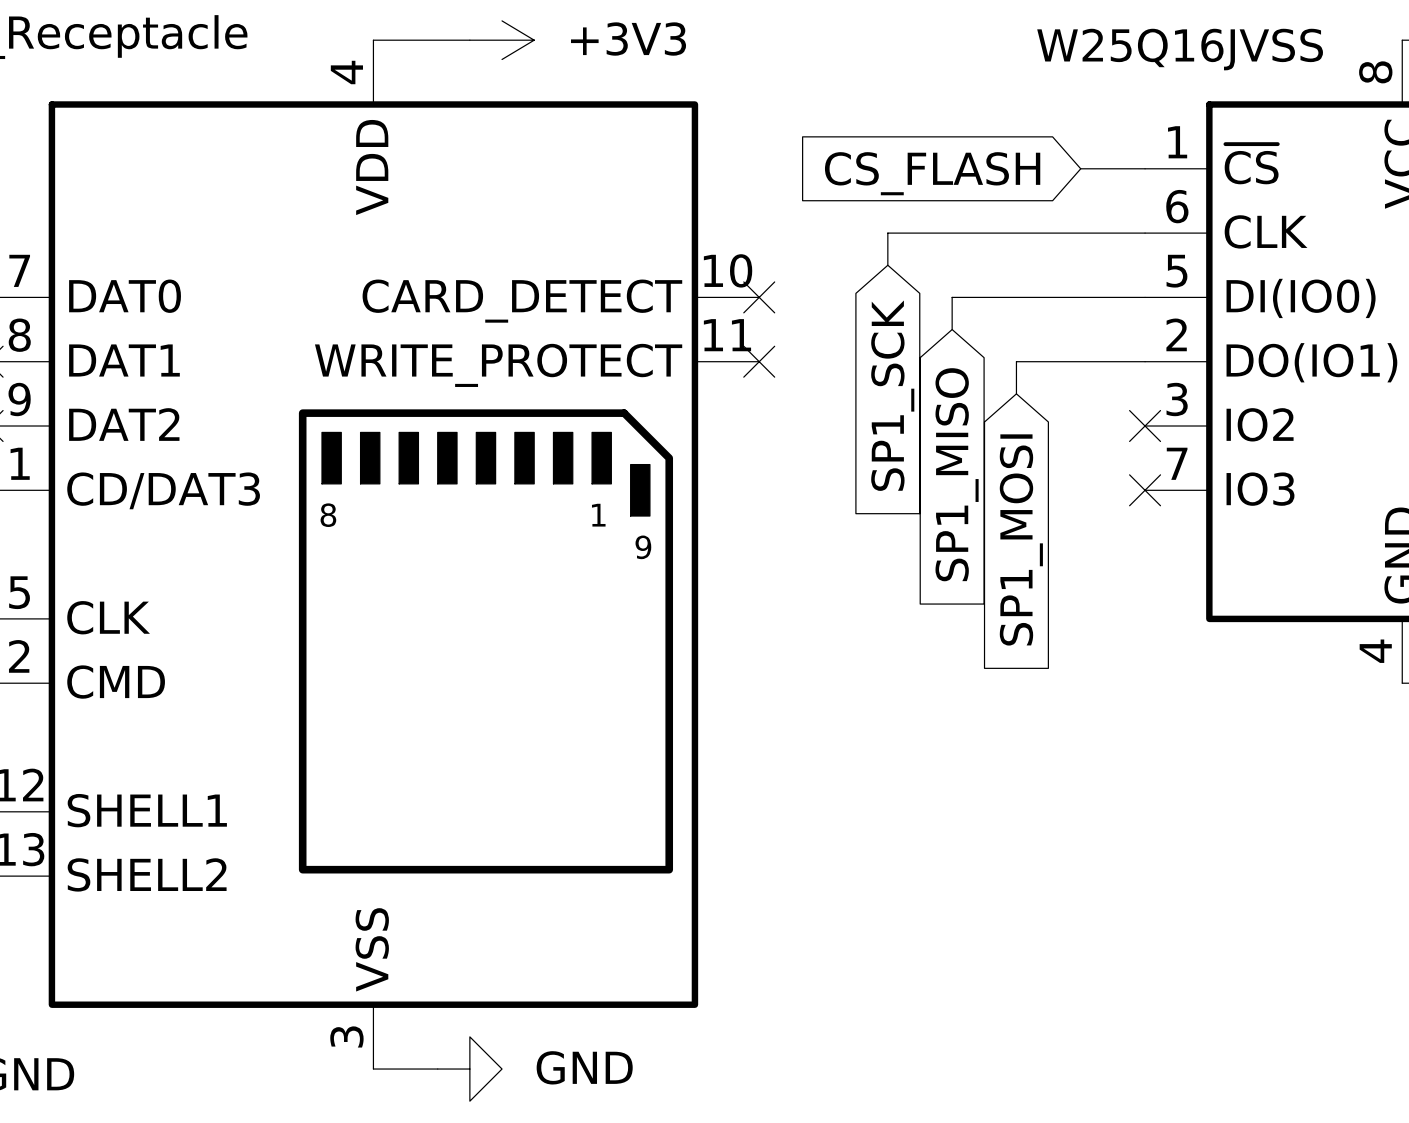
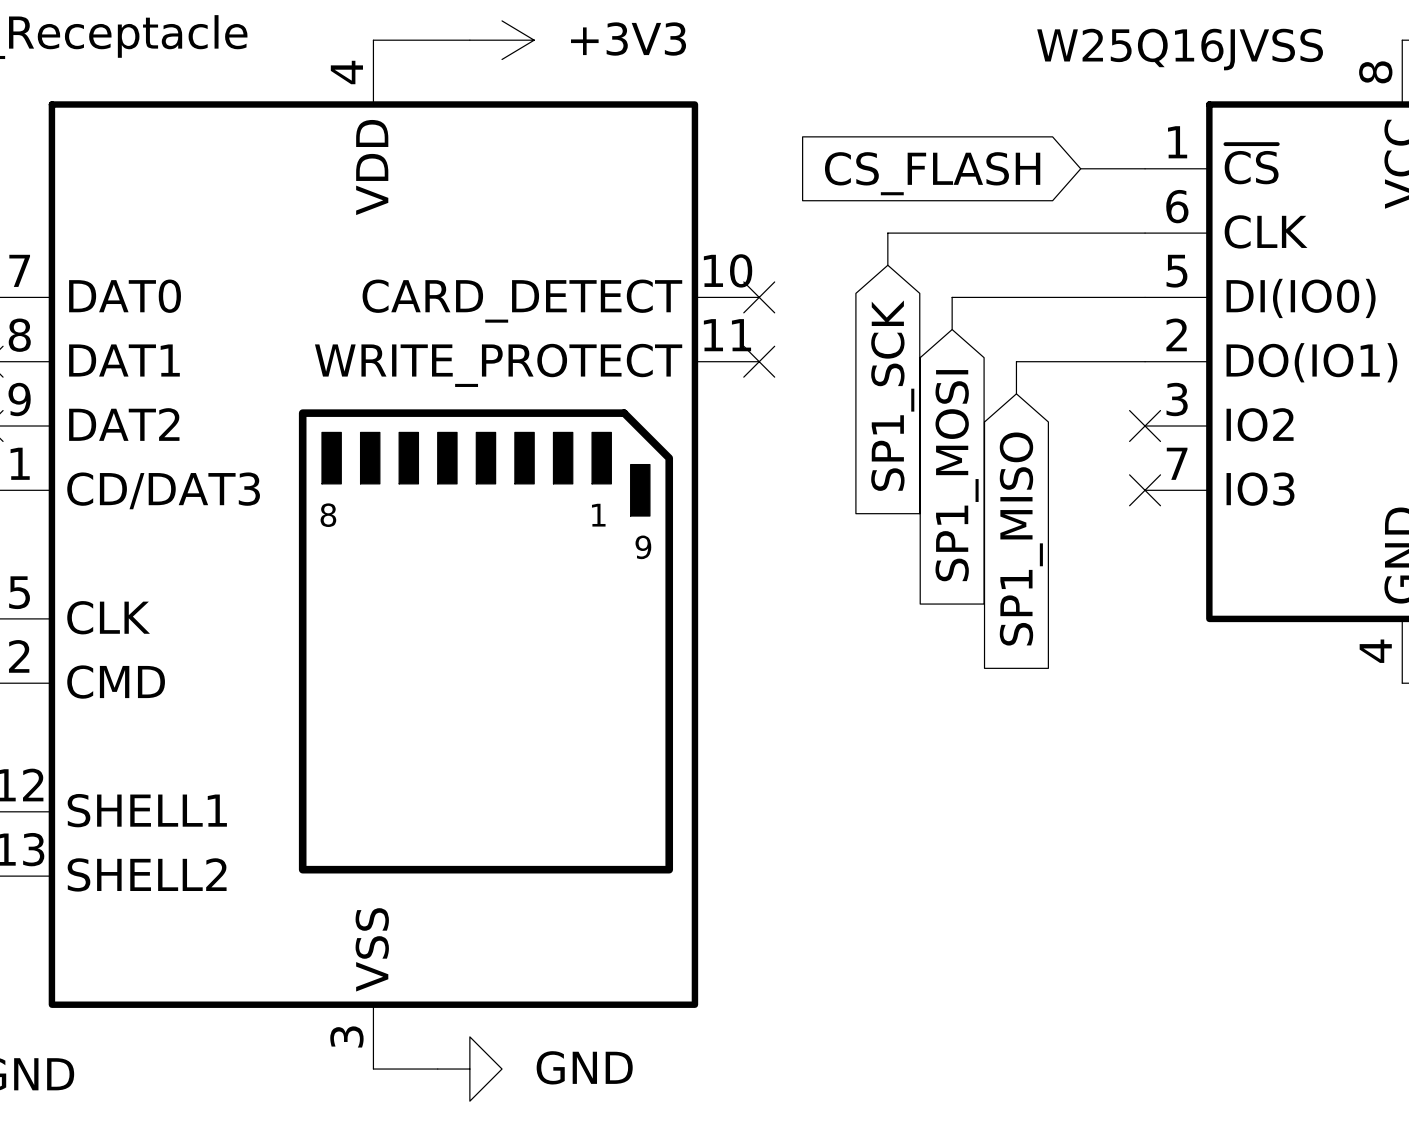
global label: SP1_MISO (957, 474) -> SP1_MOSI (957, 475)
global label: SP1_MOSI (1021, 539) -> SP1_MISO (1021, 539)

